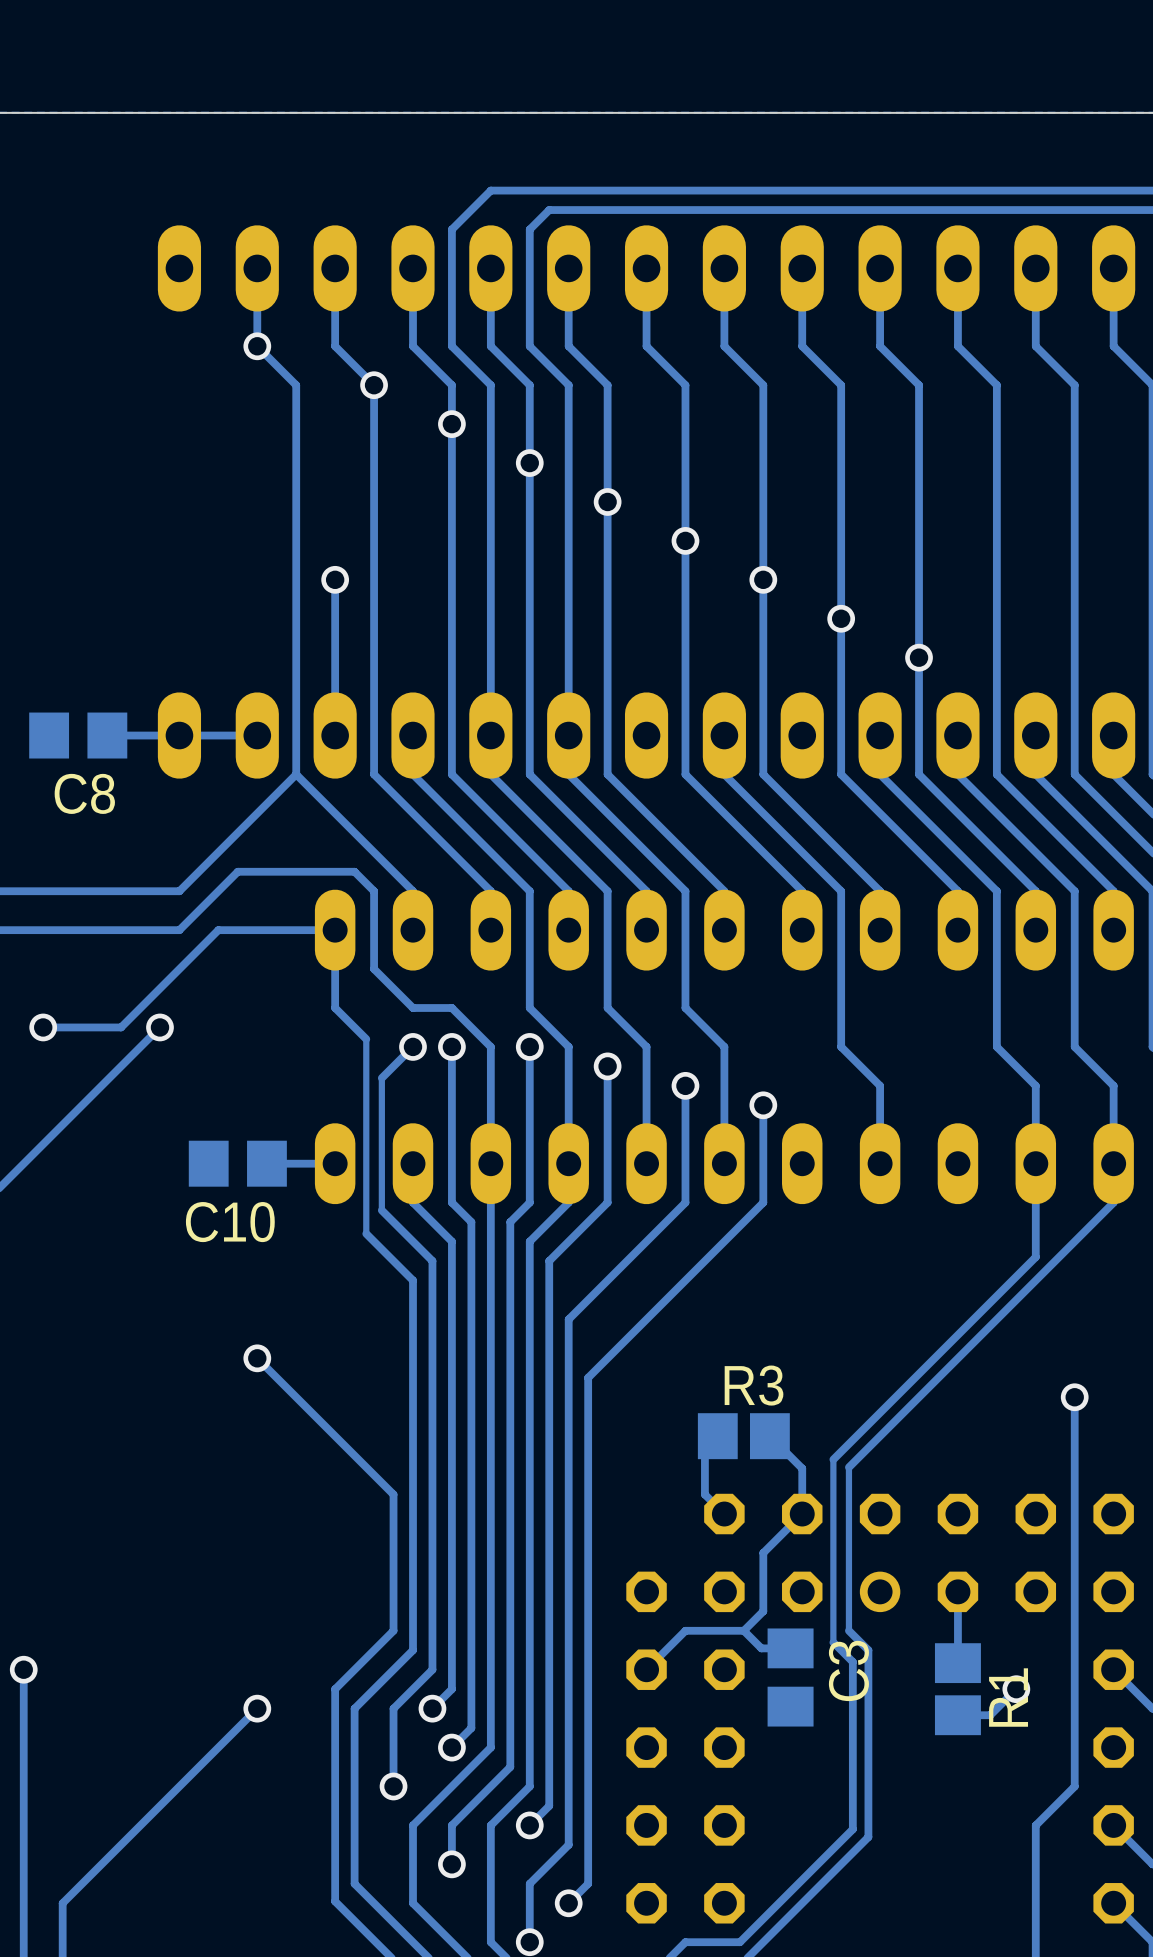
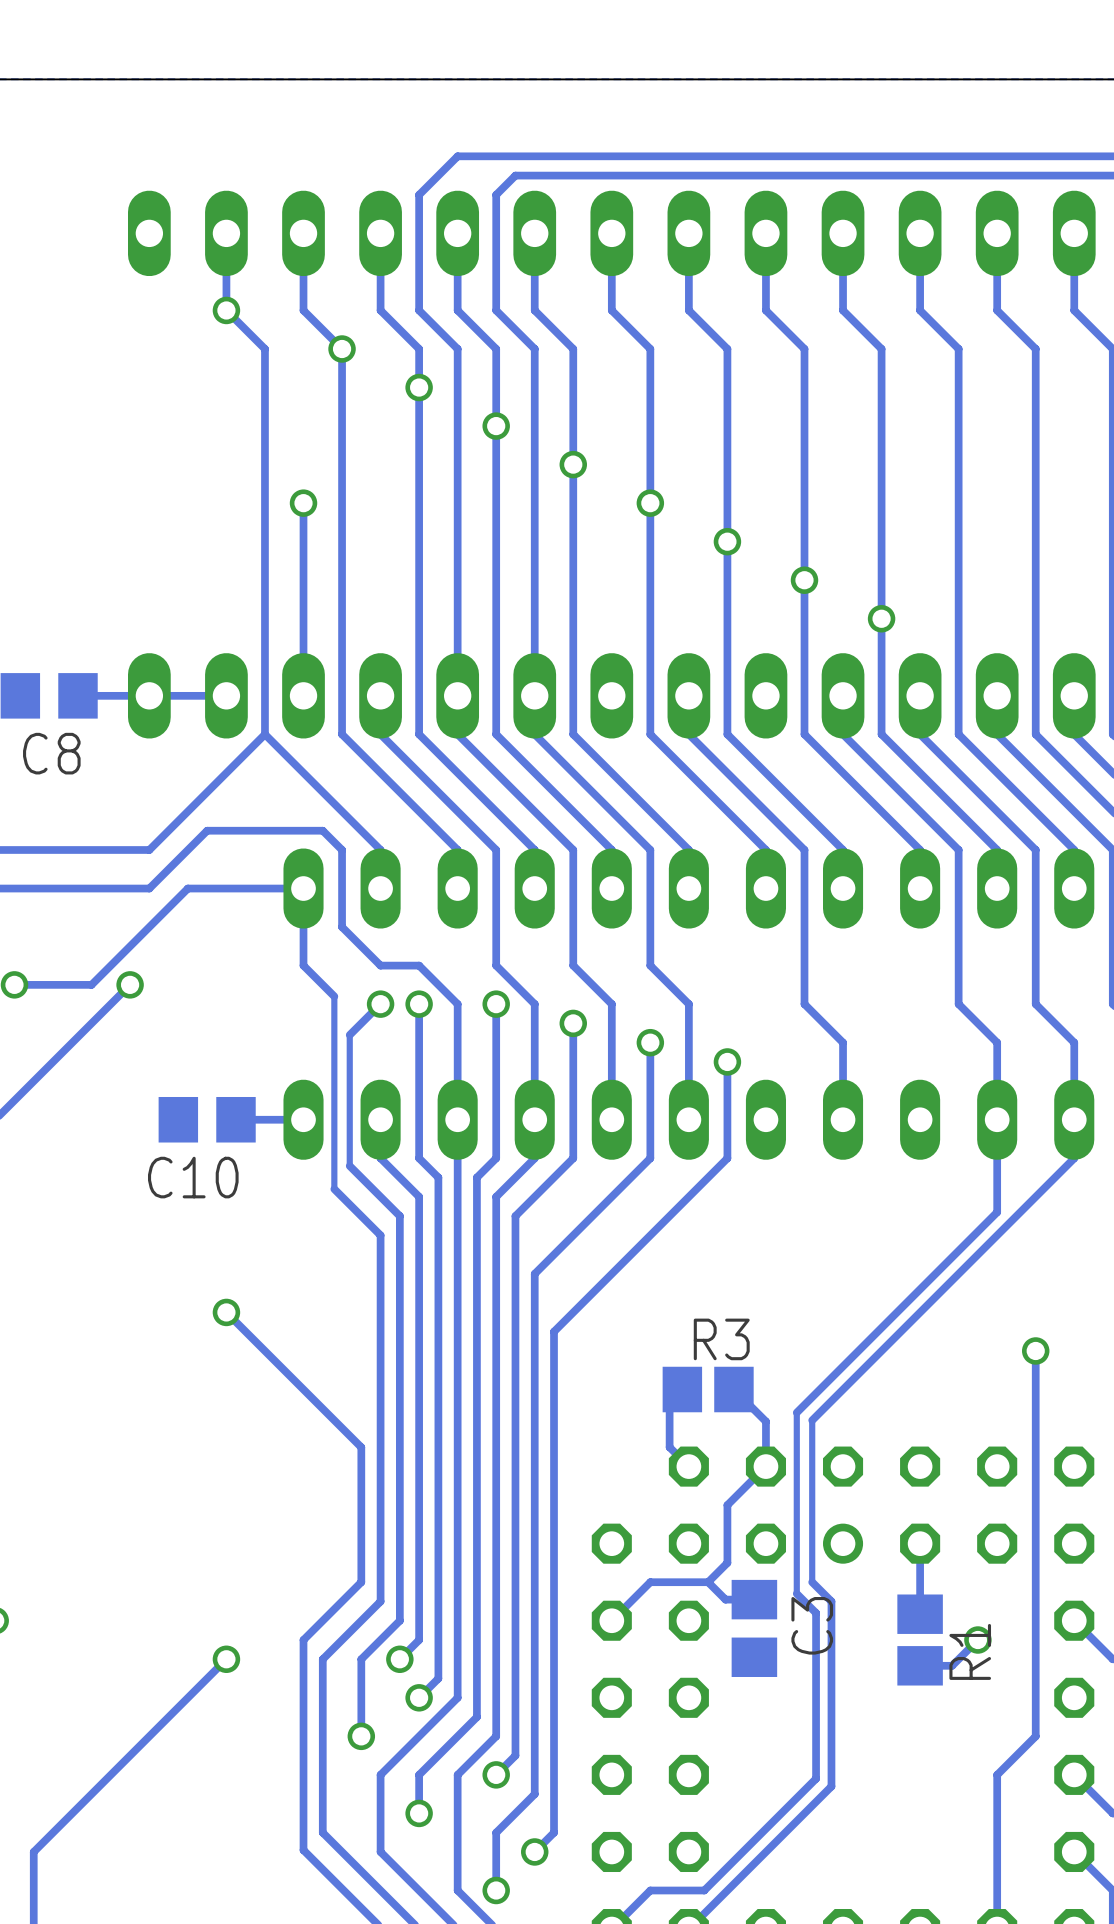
track: none -> (303, 503) (303, 541)
via position: (335, 579) -> (303, 503)

